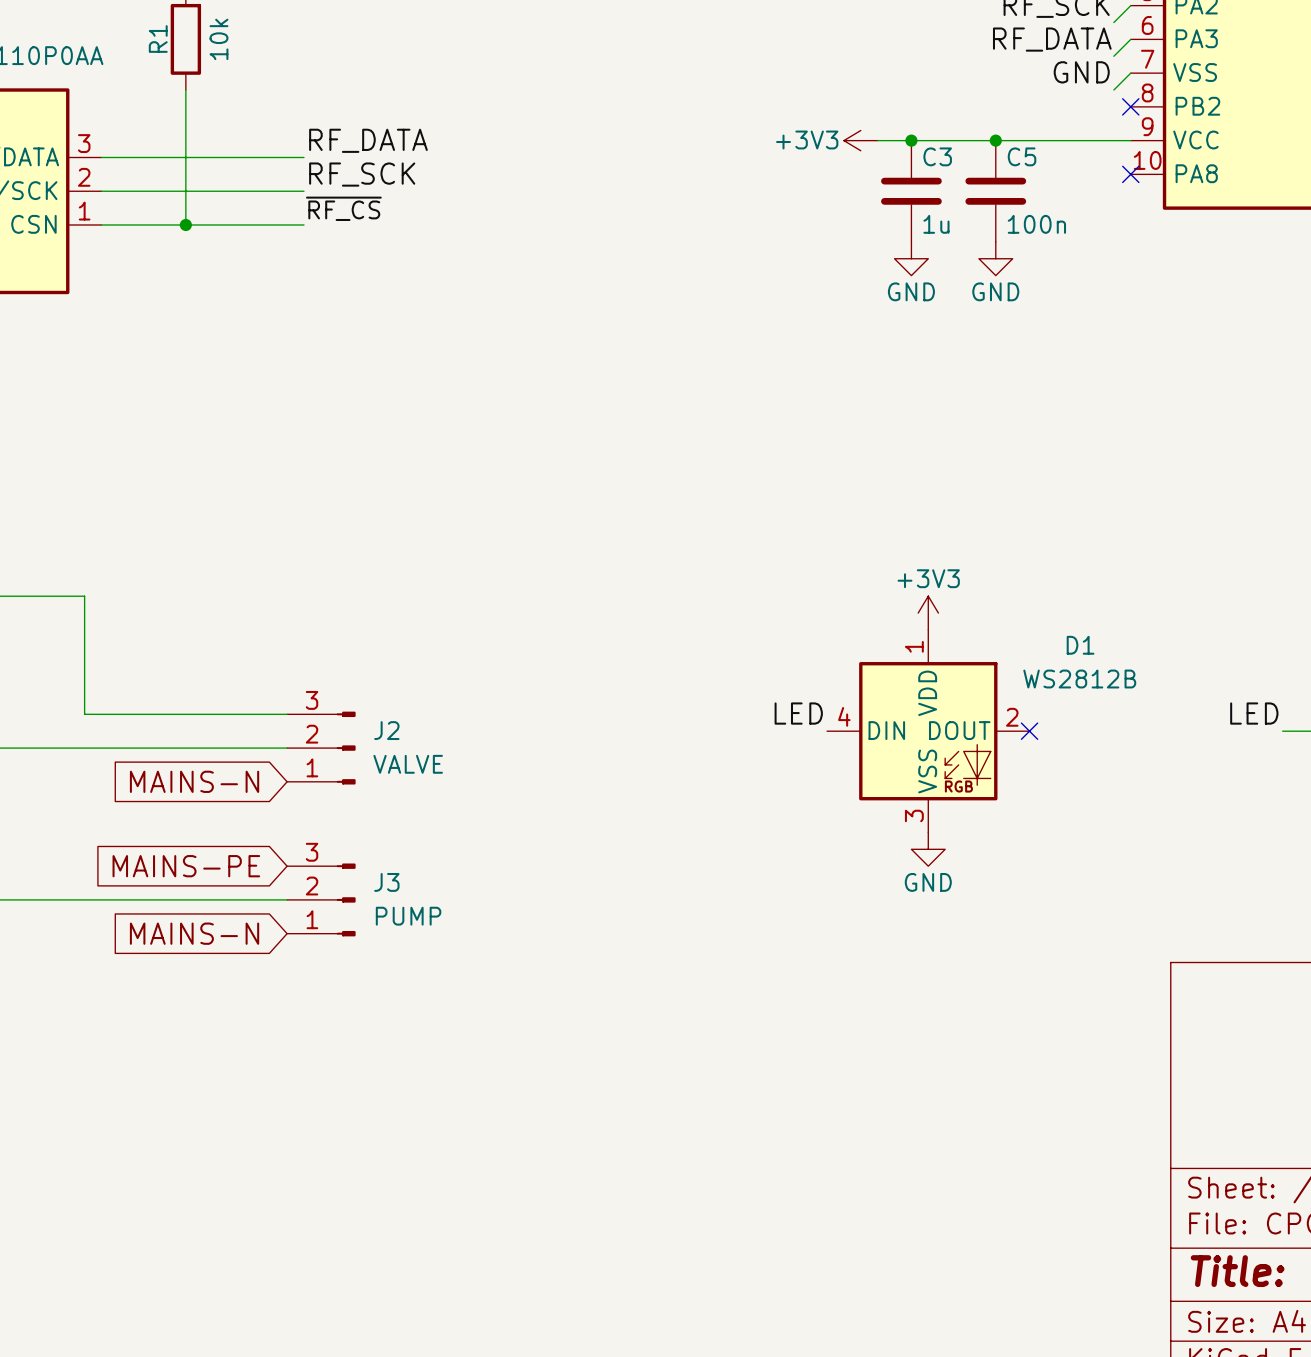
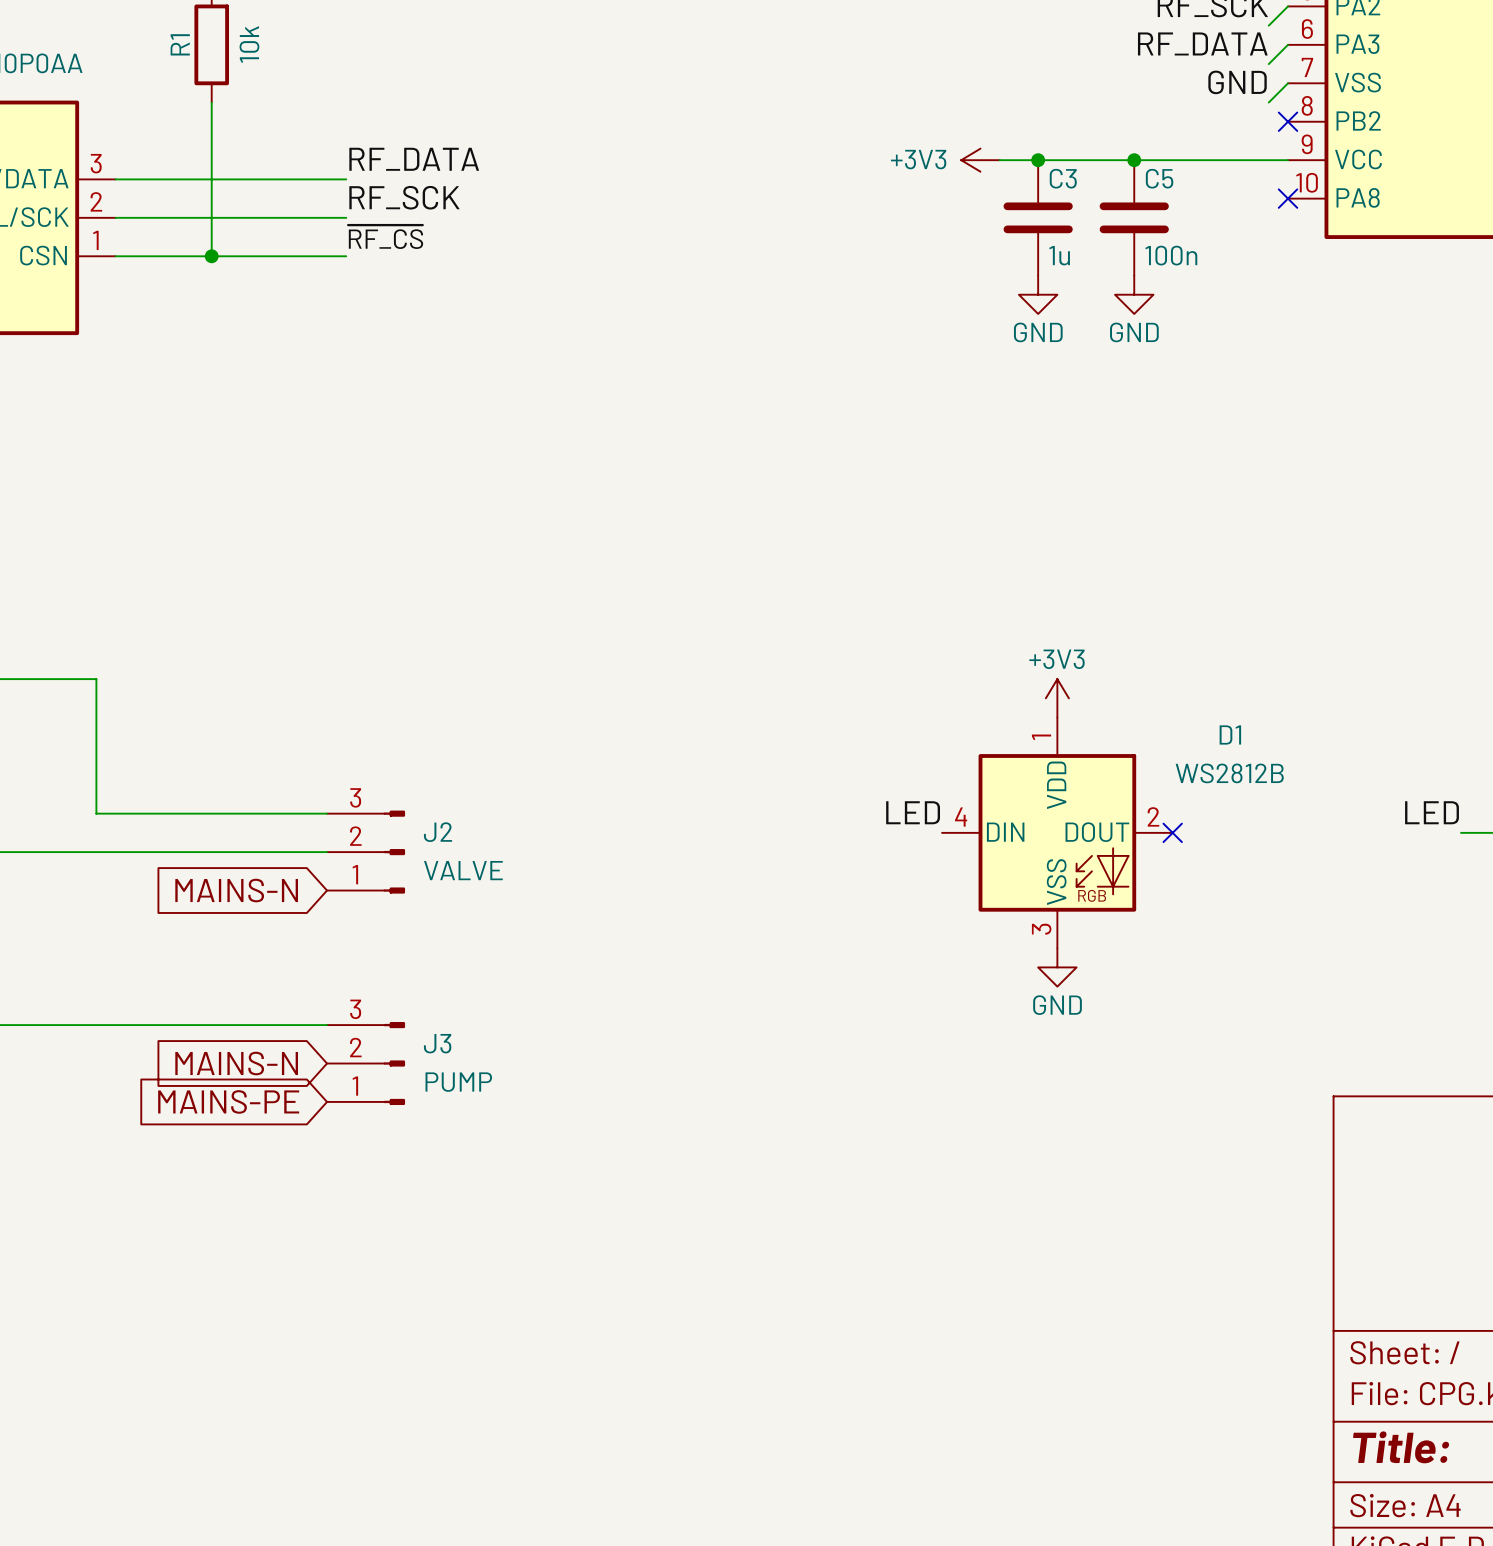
global label position: MAINS-PE (186, 866) -> MAINS-PE (228, 1101)
J3 position: (321, 899) -> (366, 1063)

